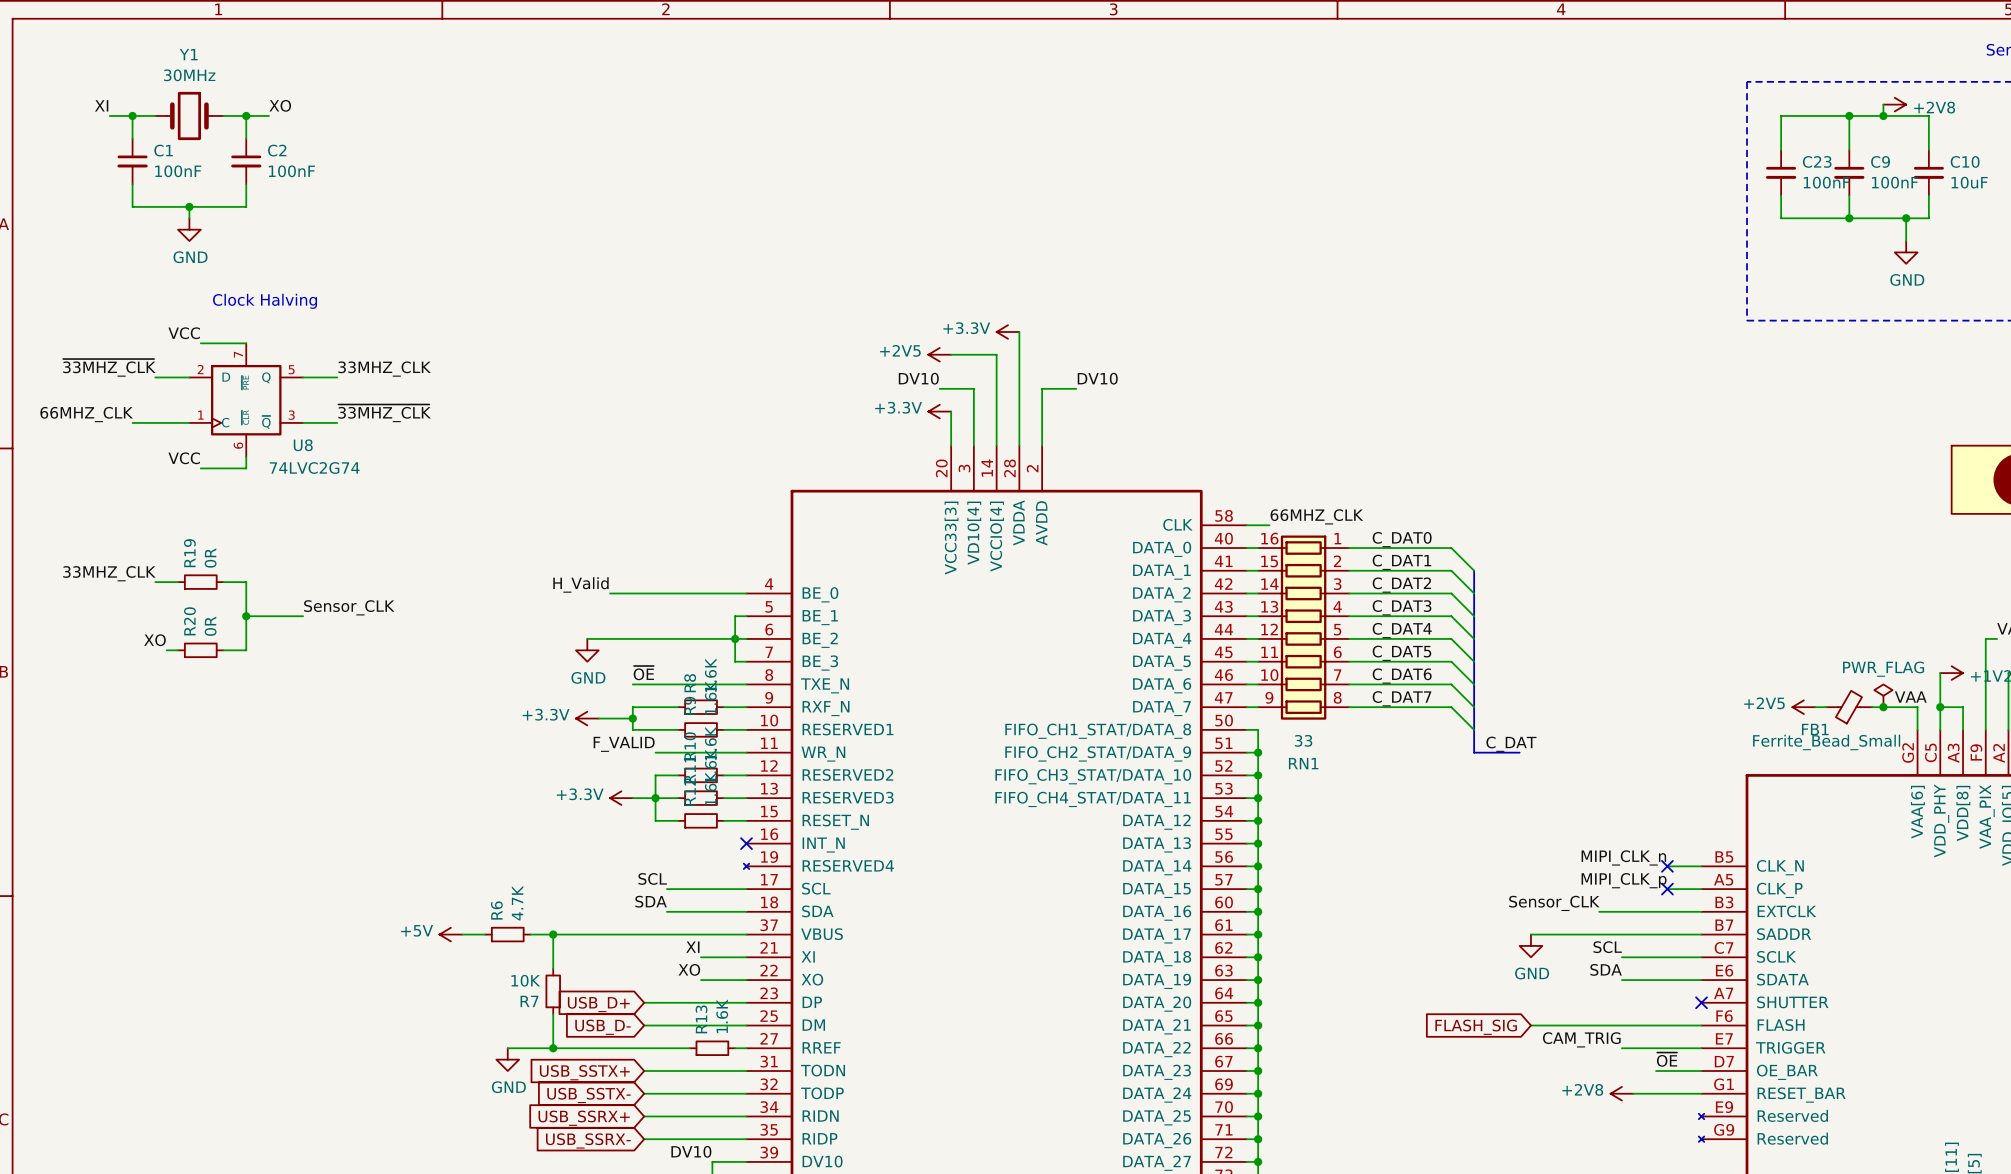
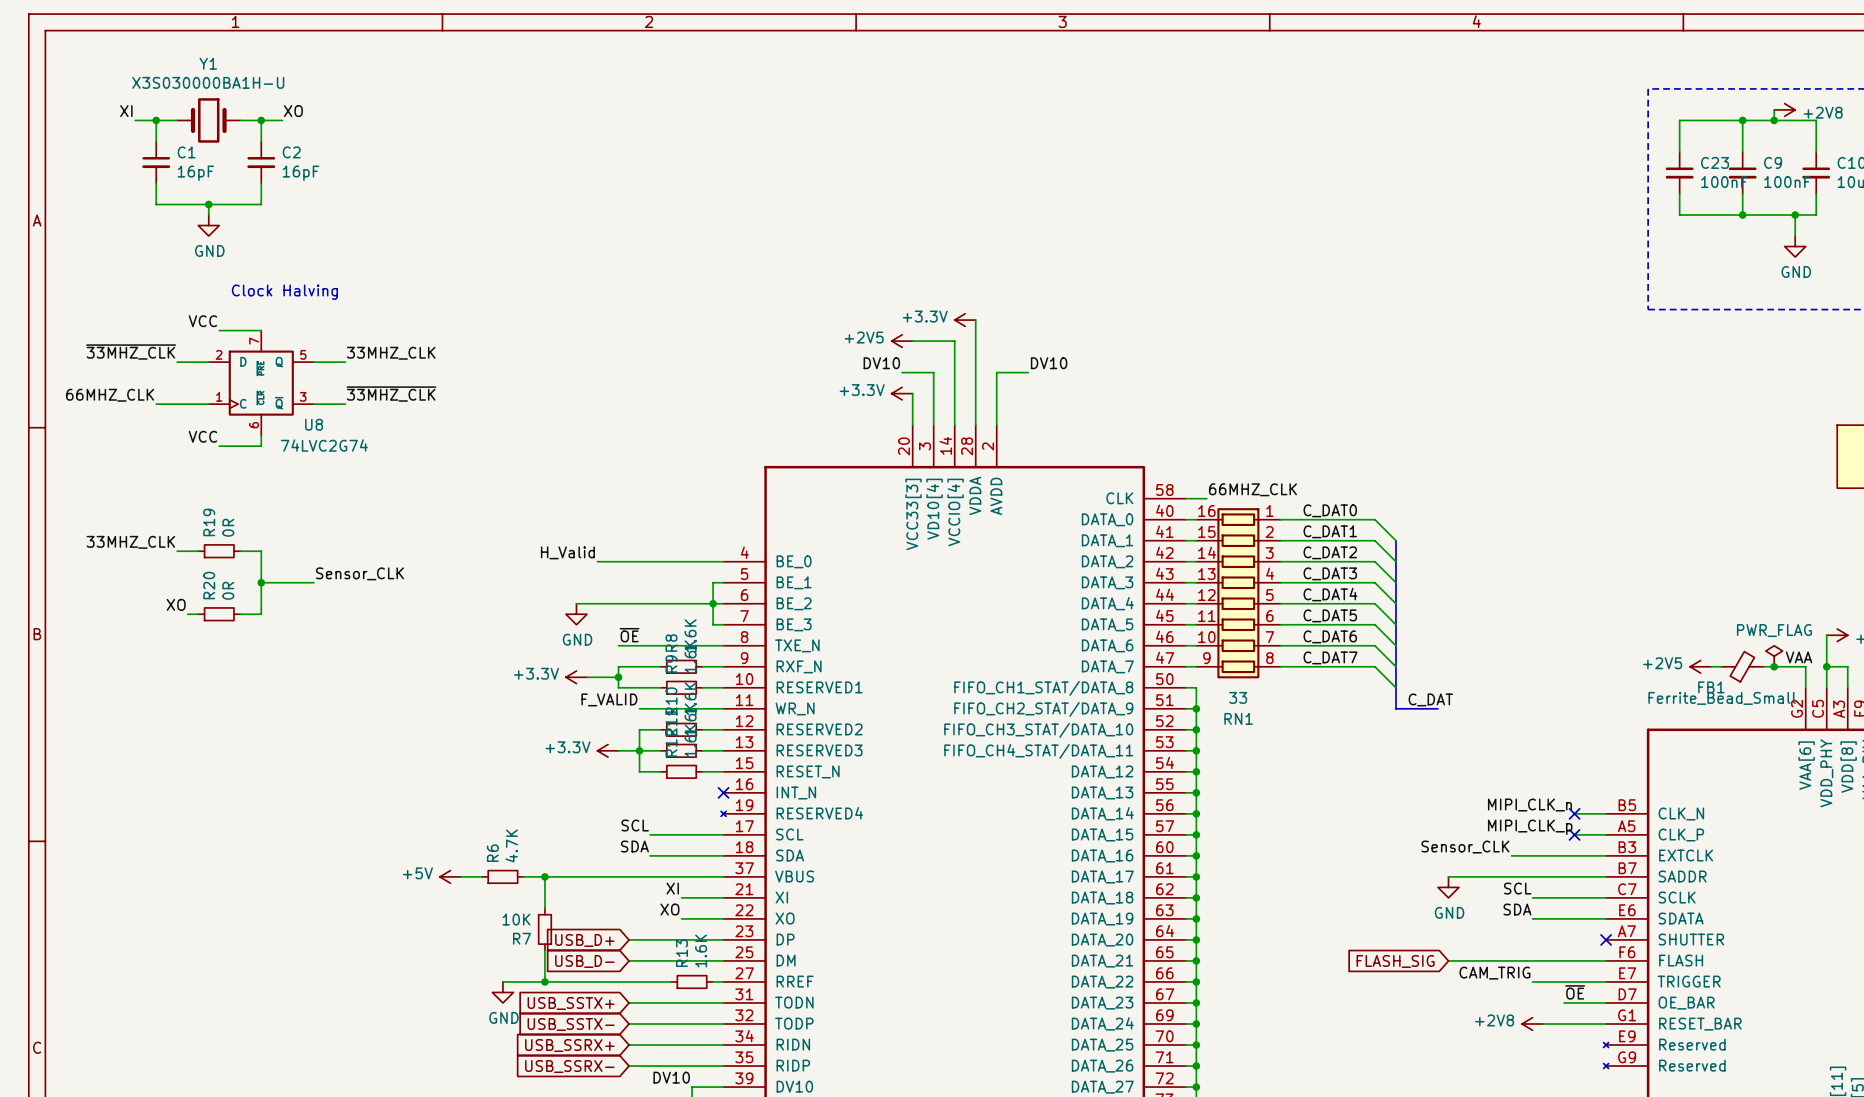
Y1 value: 30MHz (189, 75) -> X3S030000BA1H-U (208, 82)
C1 value: 100nF (178, 171) -> 16pF (195, 173)
C2 value: 100nF (291, 171) -> 16pF (300, 173)

